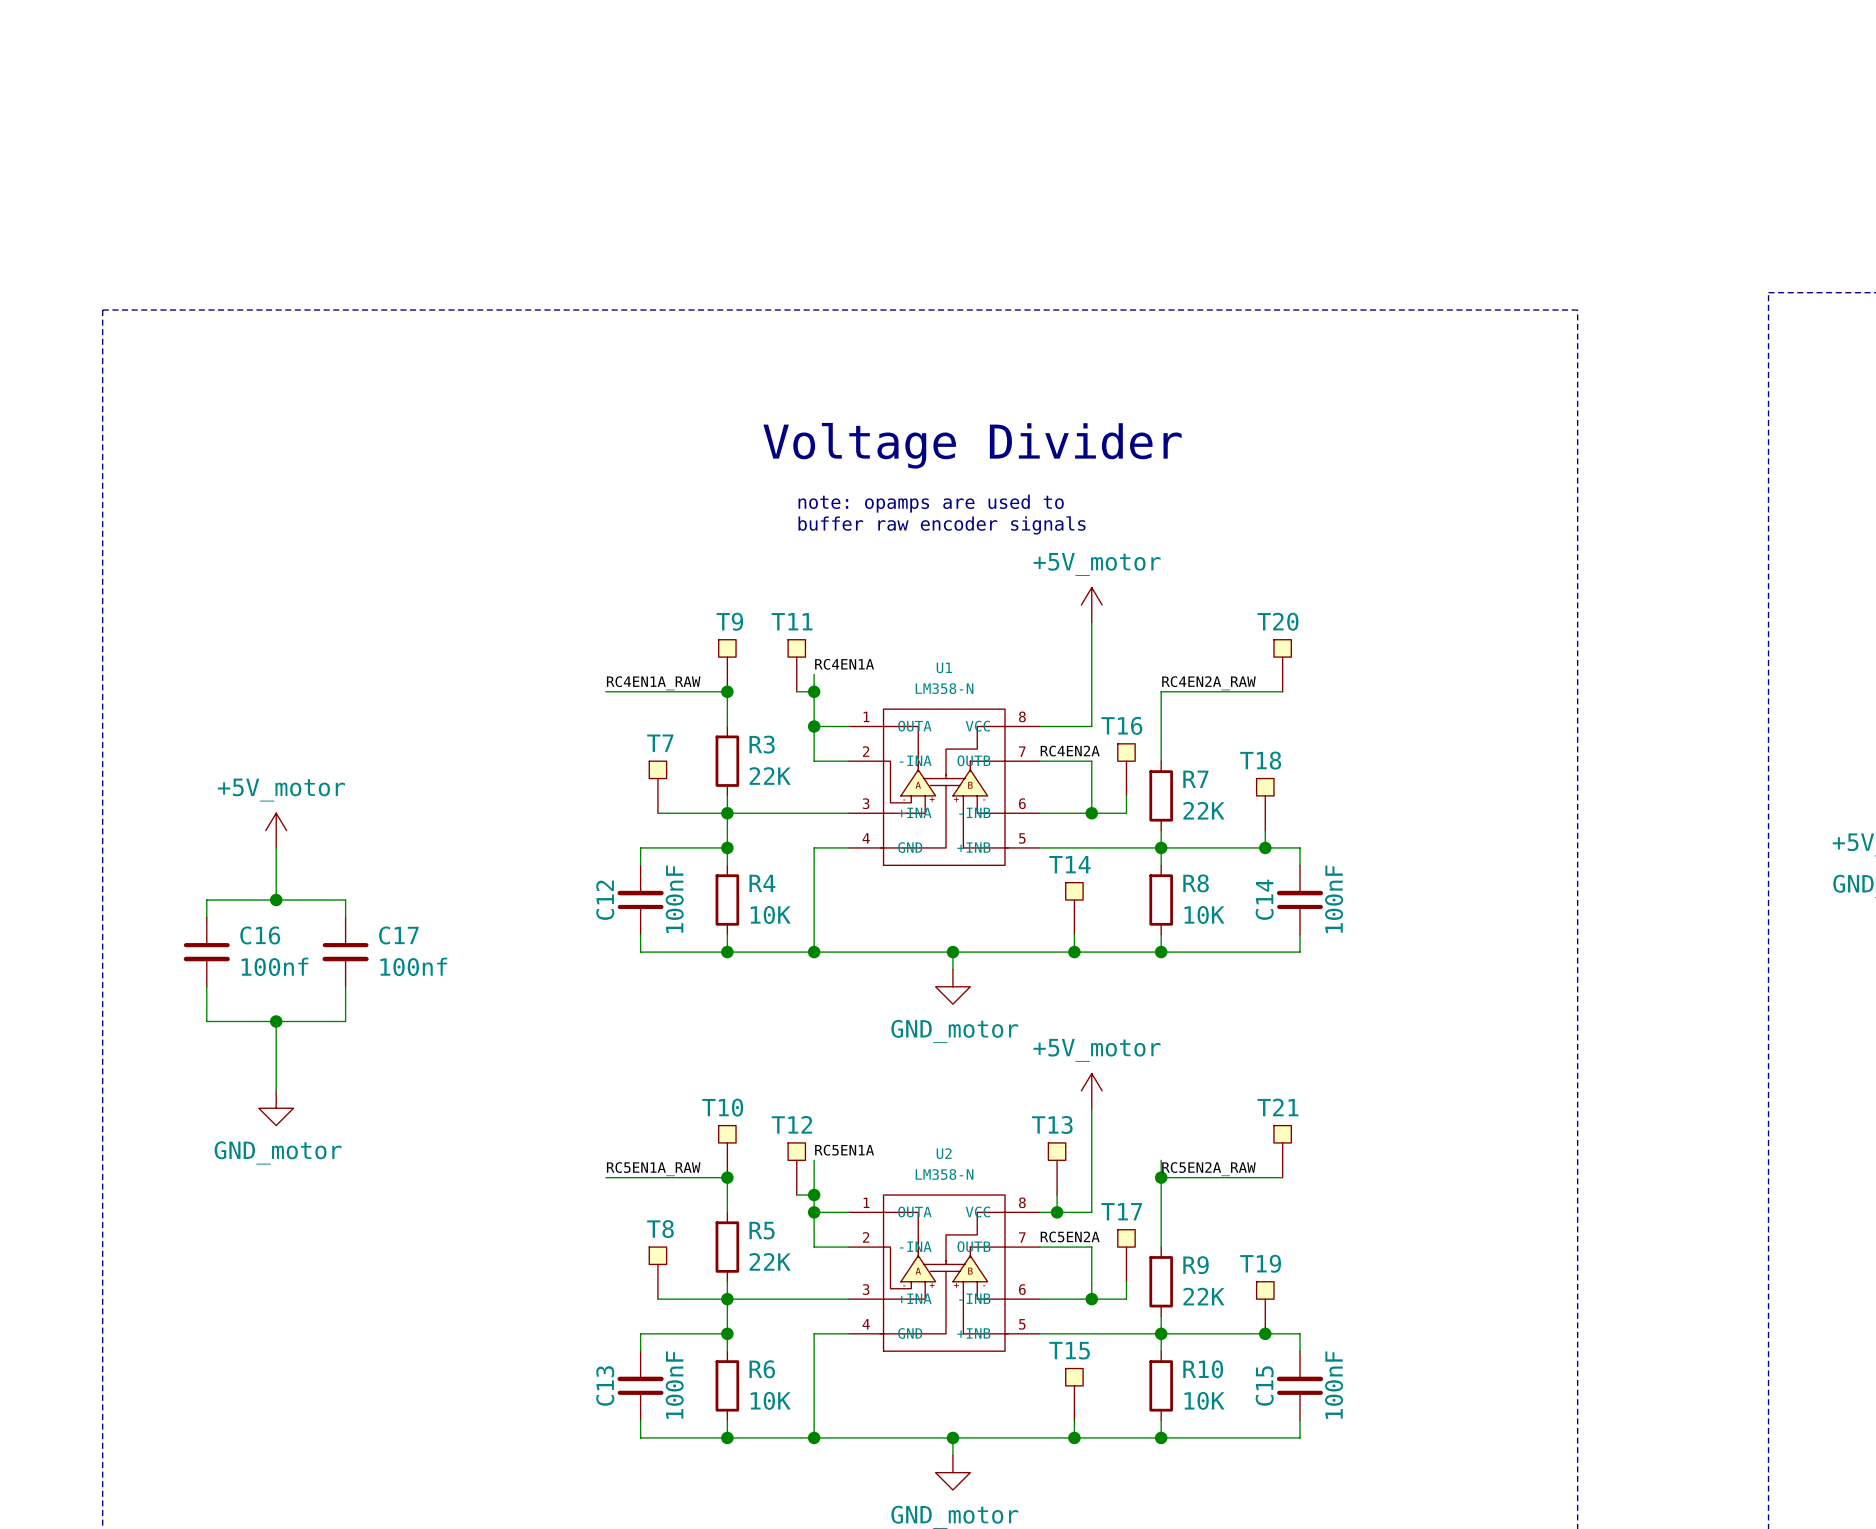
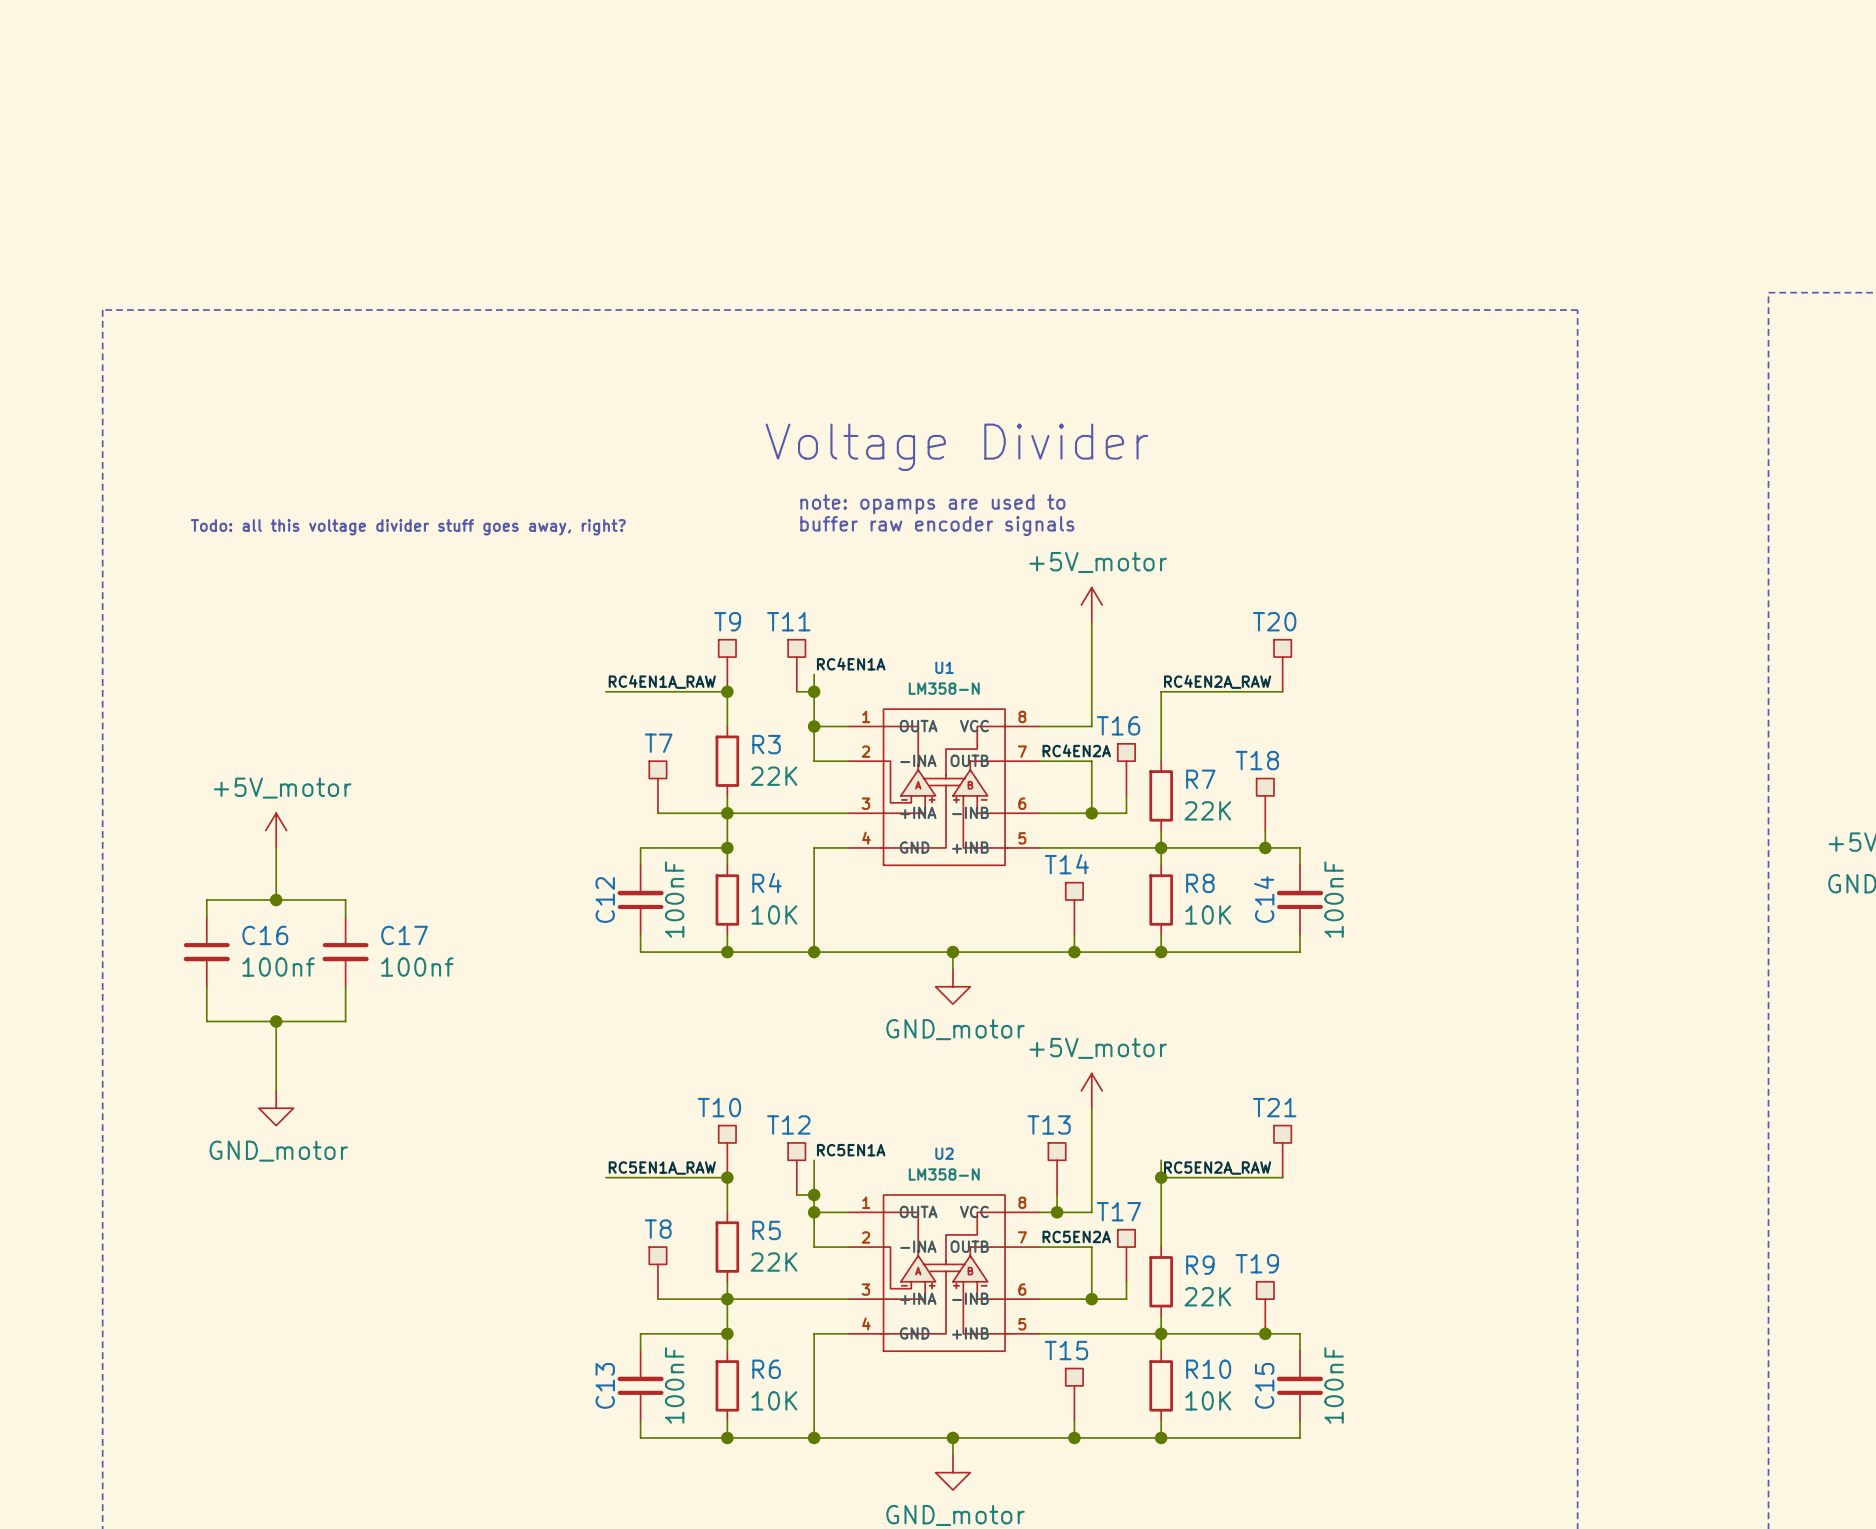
text: none -> Todo: all this voltage divider stuff goes away, right? (408, 527)

